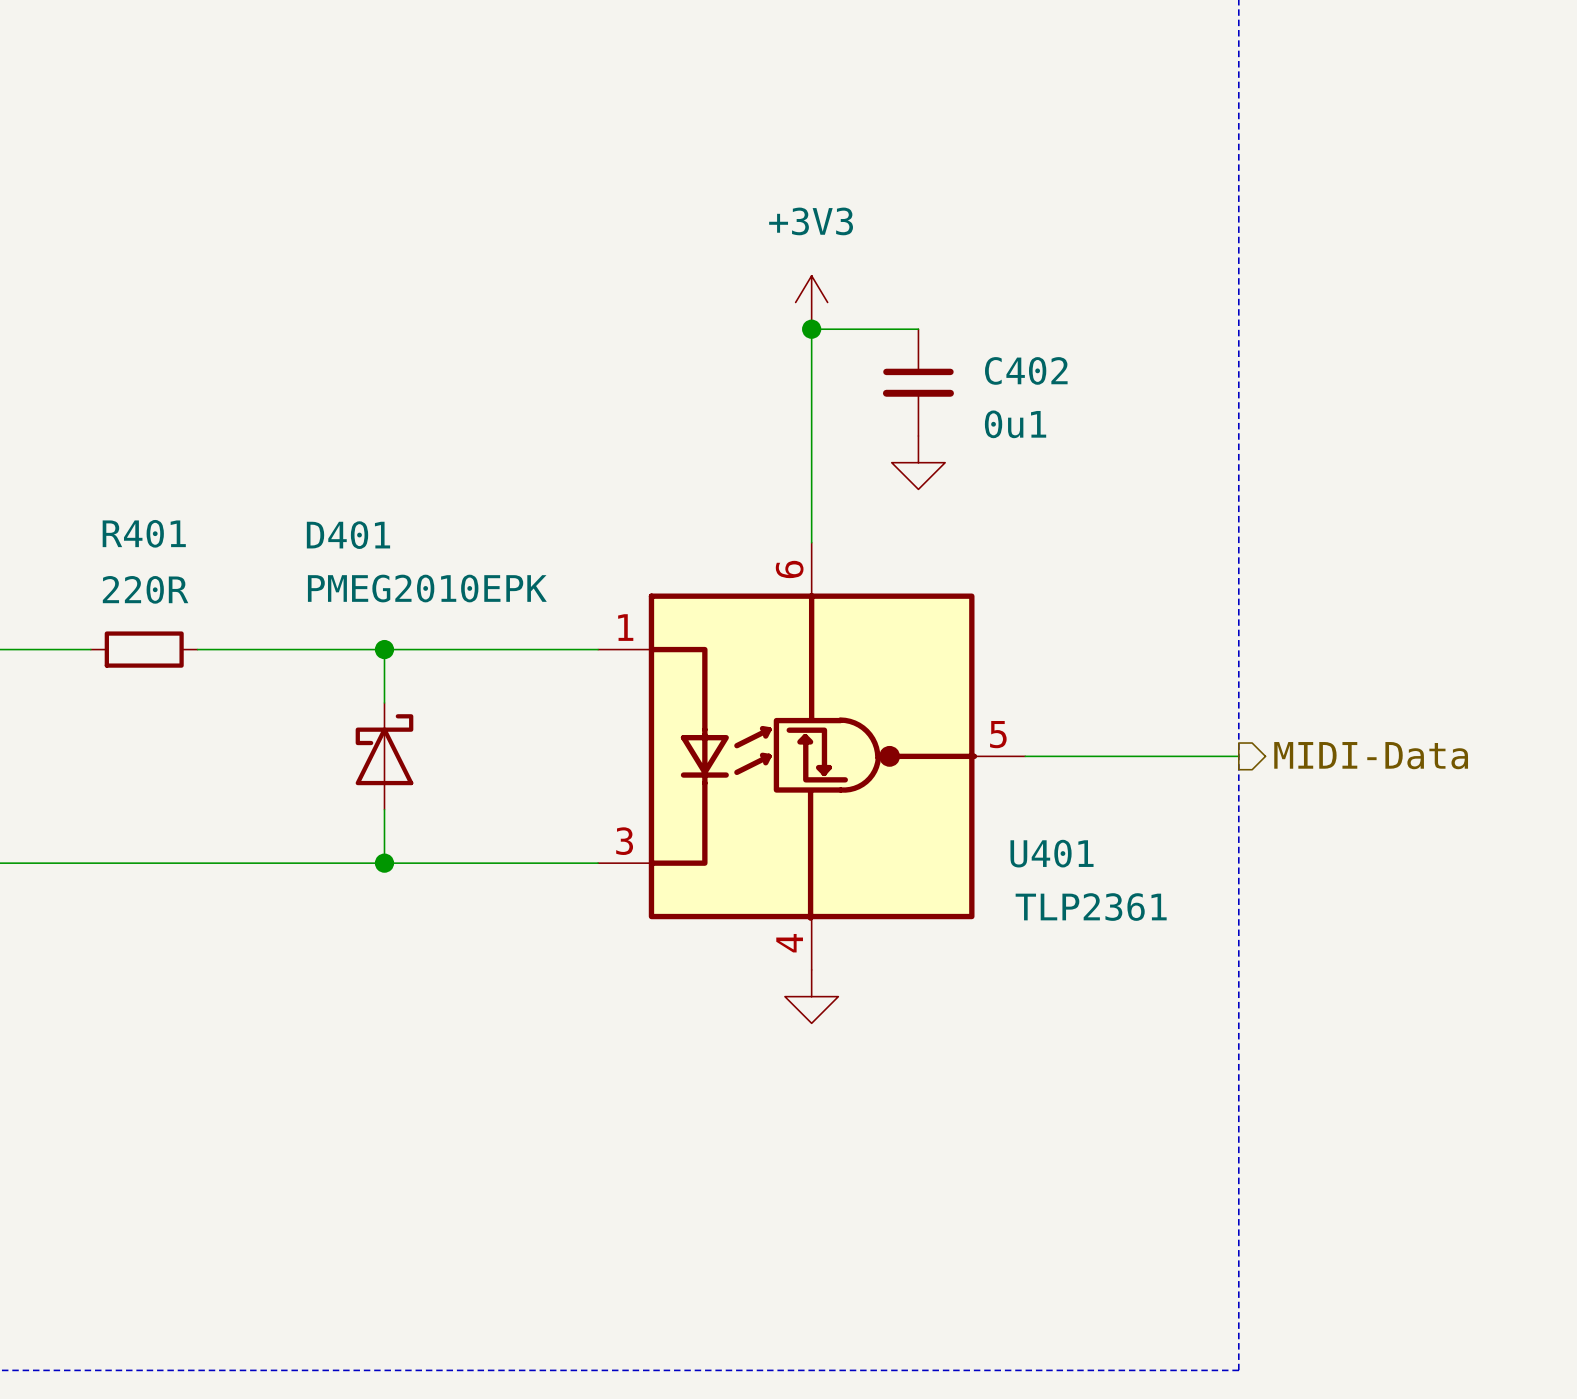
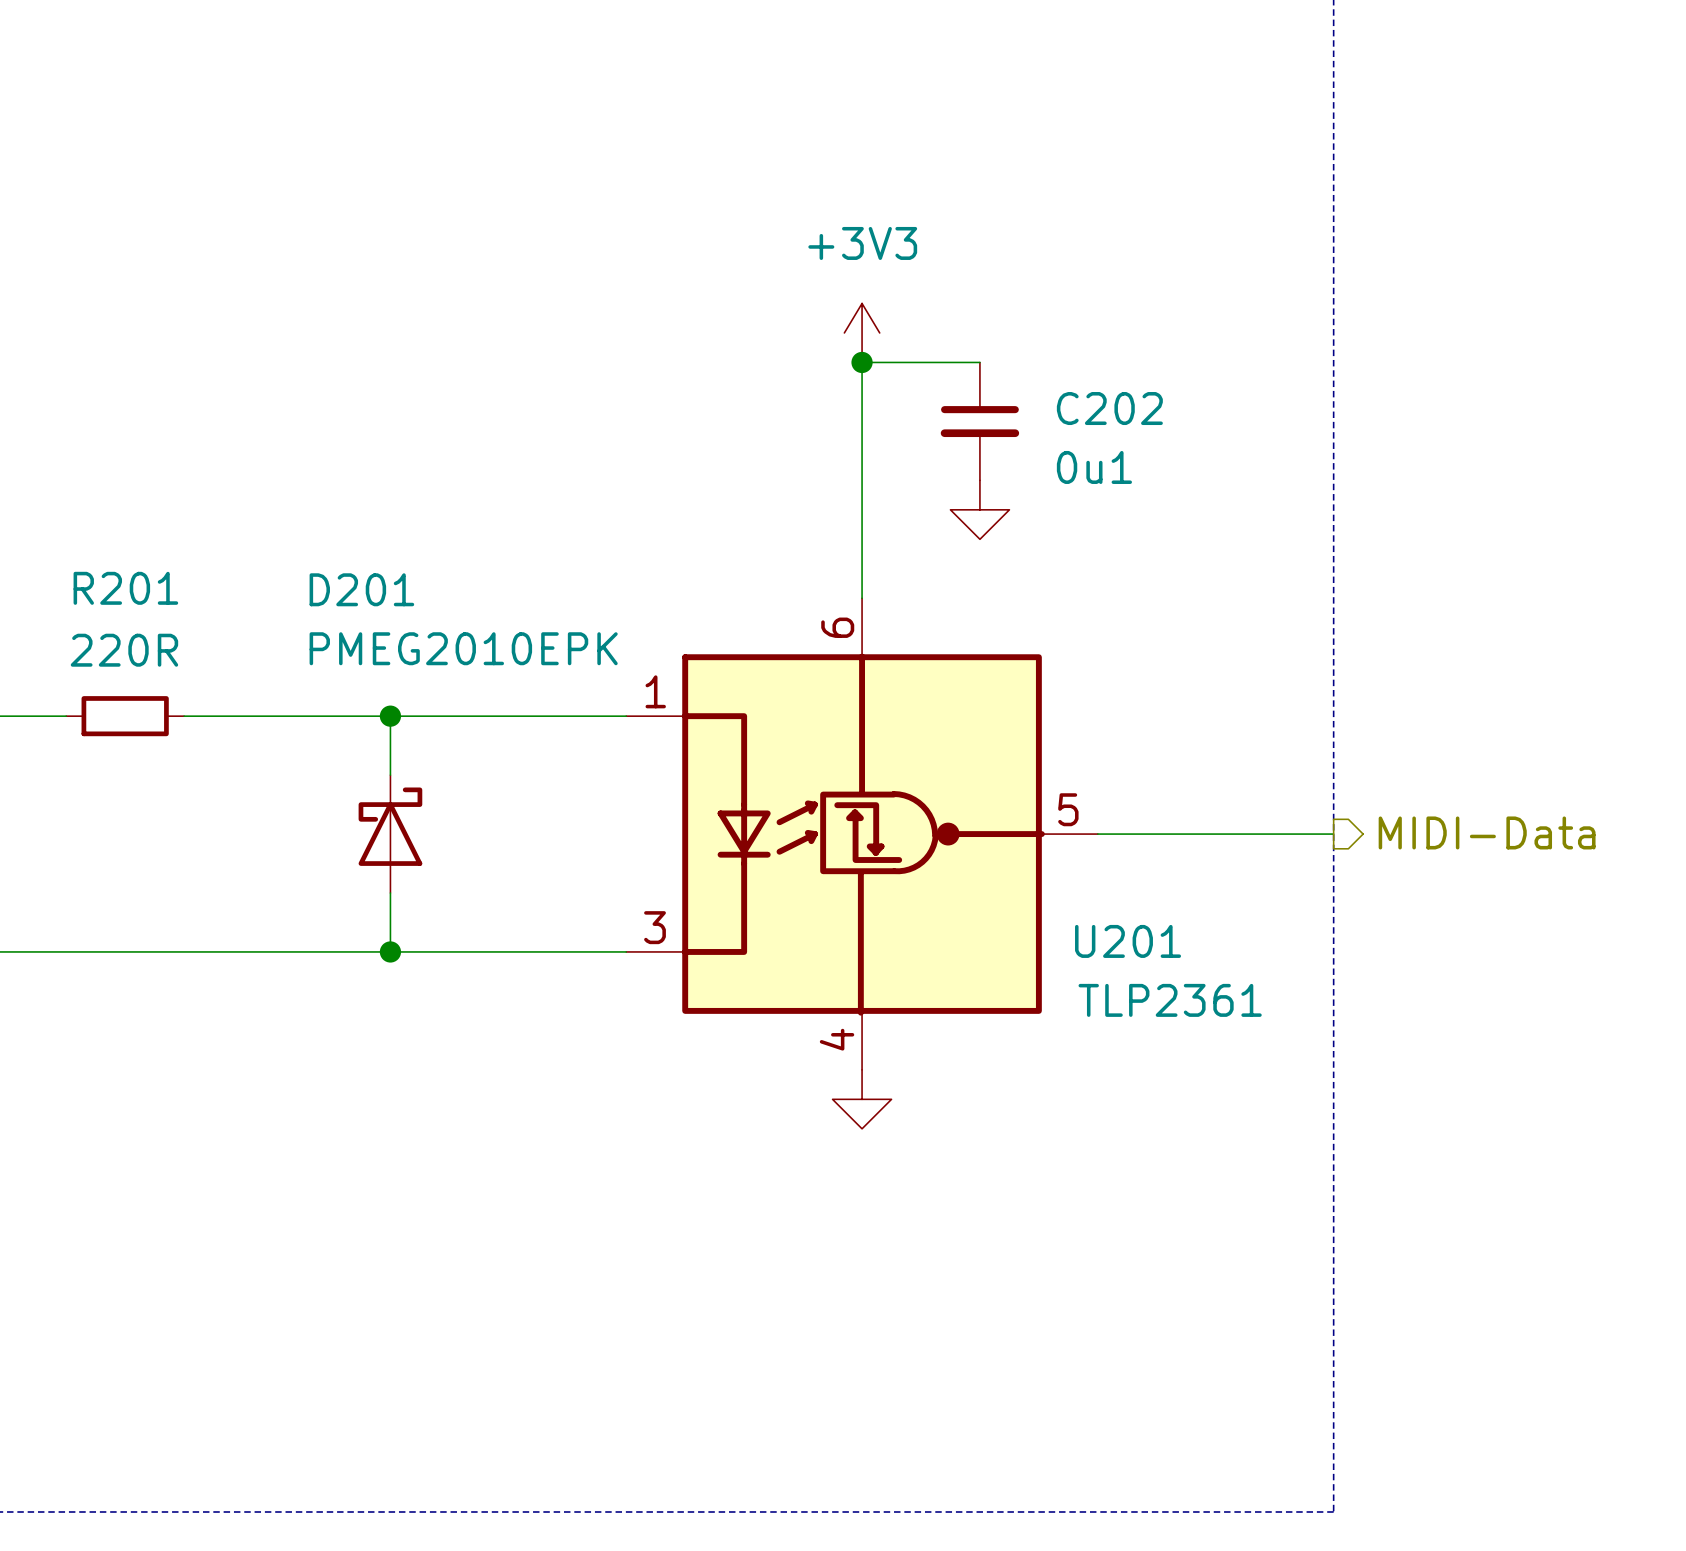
C402 name: C402 (1026, 370) -> C202 (1109, 408)
R401 name: R401 (144, 533) -> R201 (125, 588)
D401 name: D401 (348, 535) -> D201 (361, 589)
U401 name: U401 (1052, 853) -> U201 (1128, 941)

